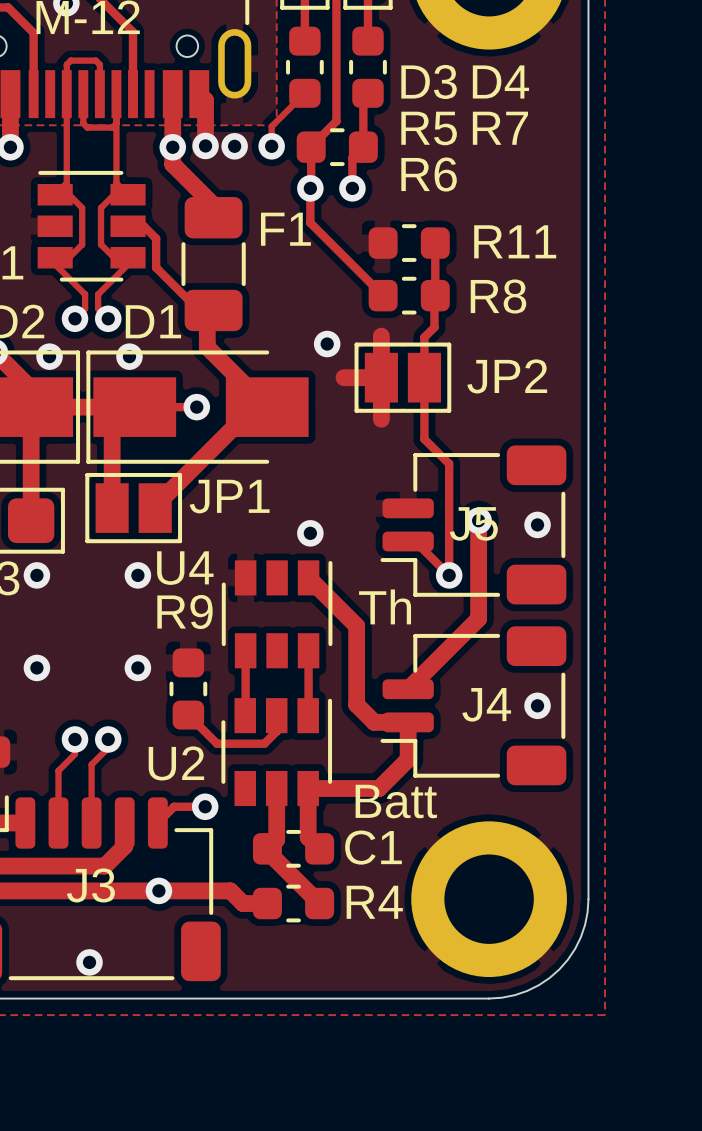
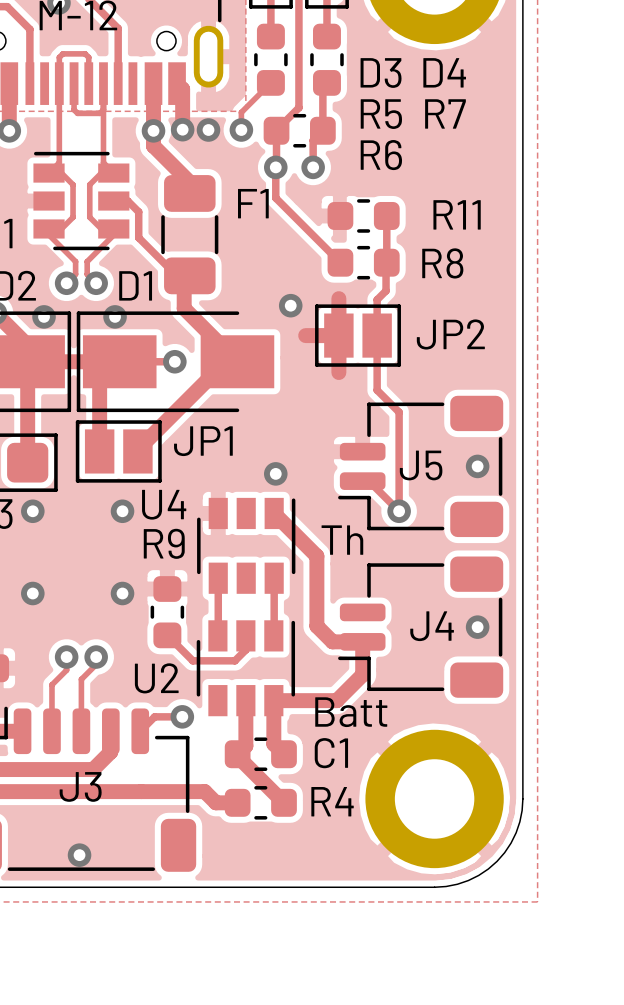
track: (478, 520) (478, 618) (408, 689) -> none
via: (478, 520) -> none
via: (158, 890) -> none

